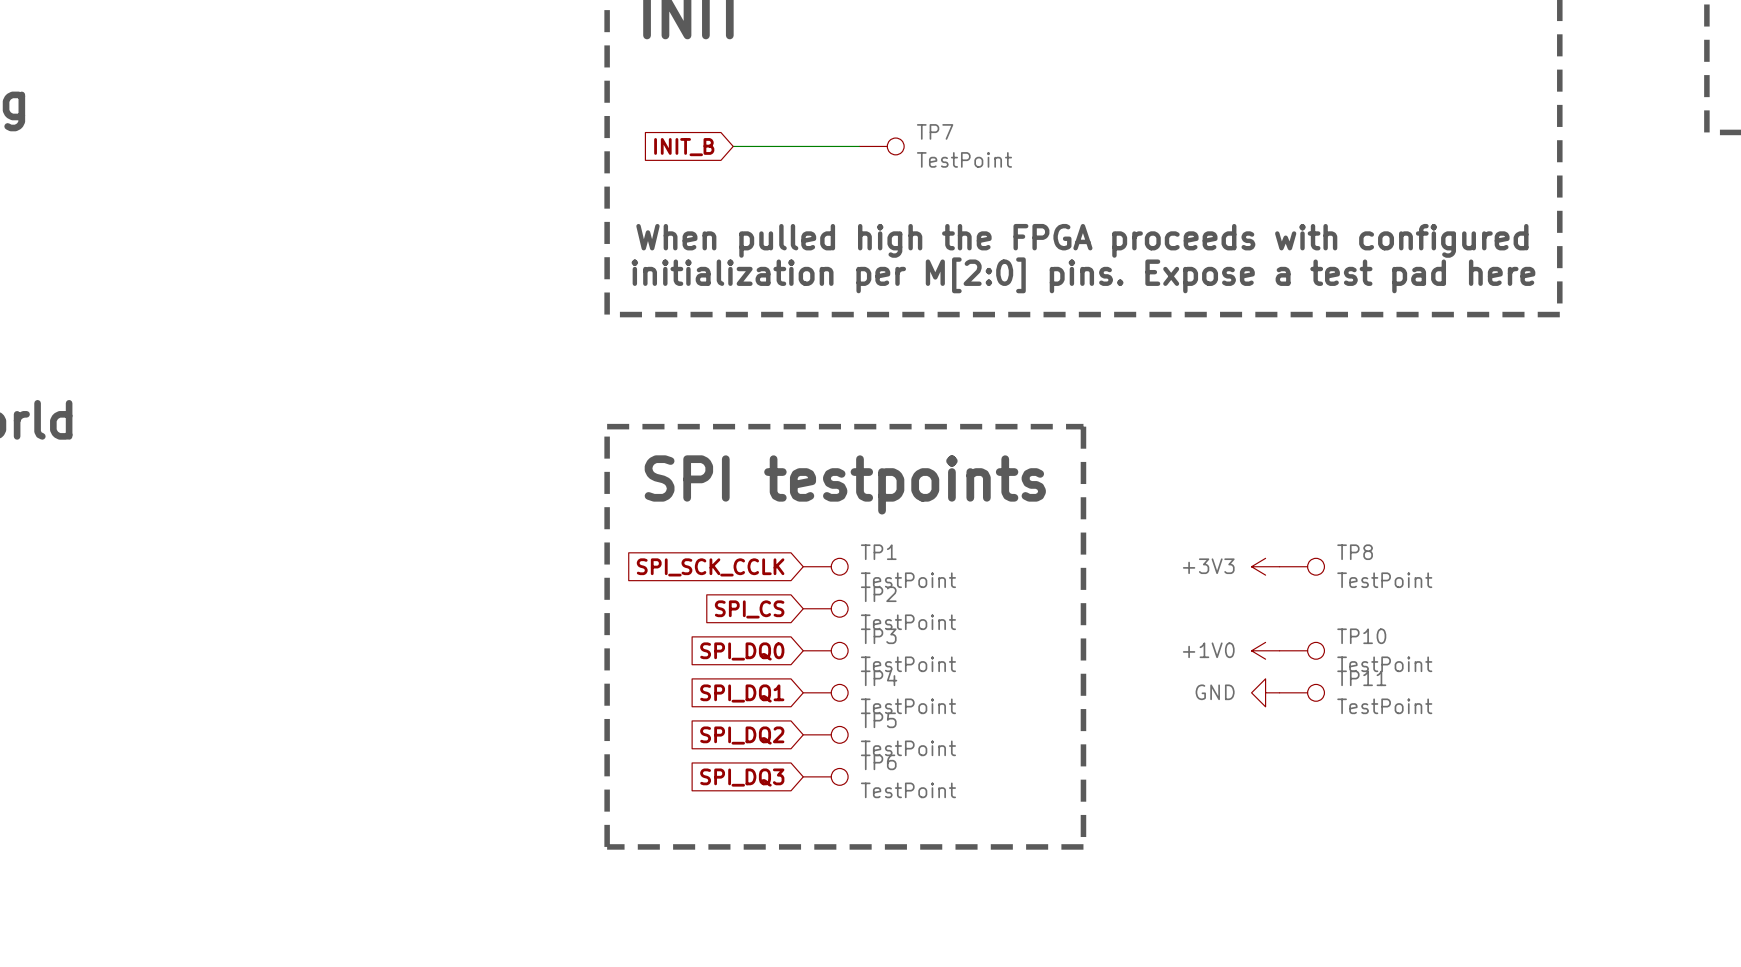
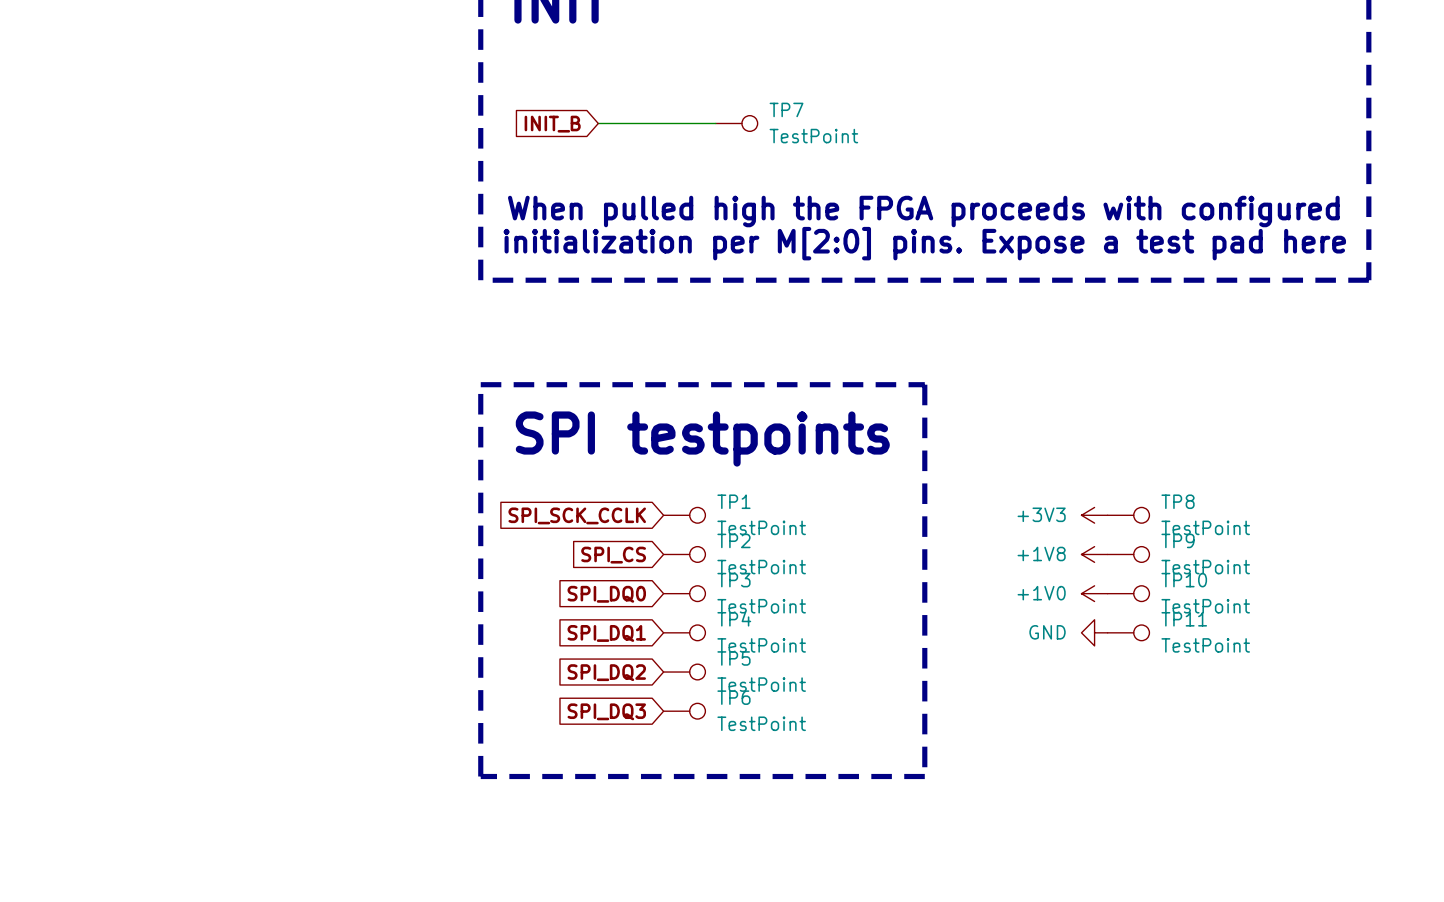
power symbol: none -> +1V8 (1094, 554)
TP9: none -> TestPoint (1128, 554)

